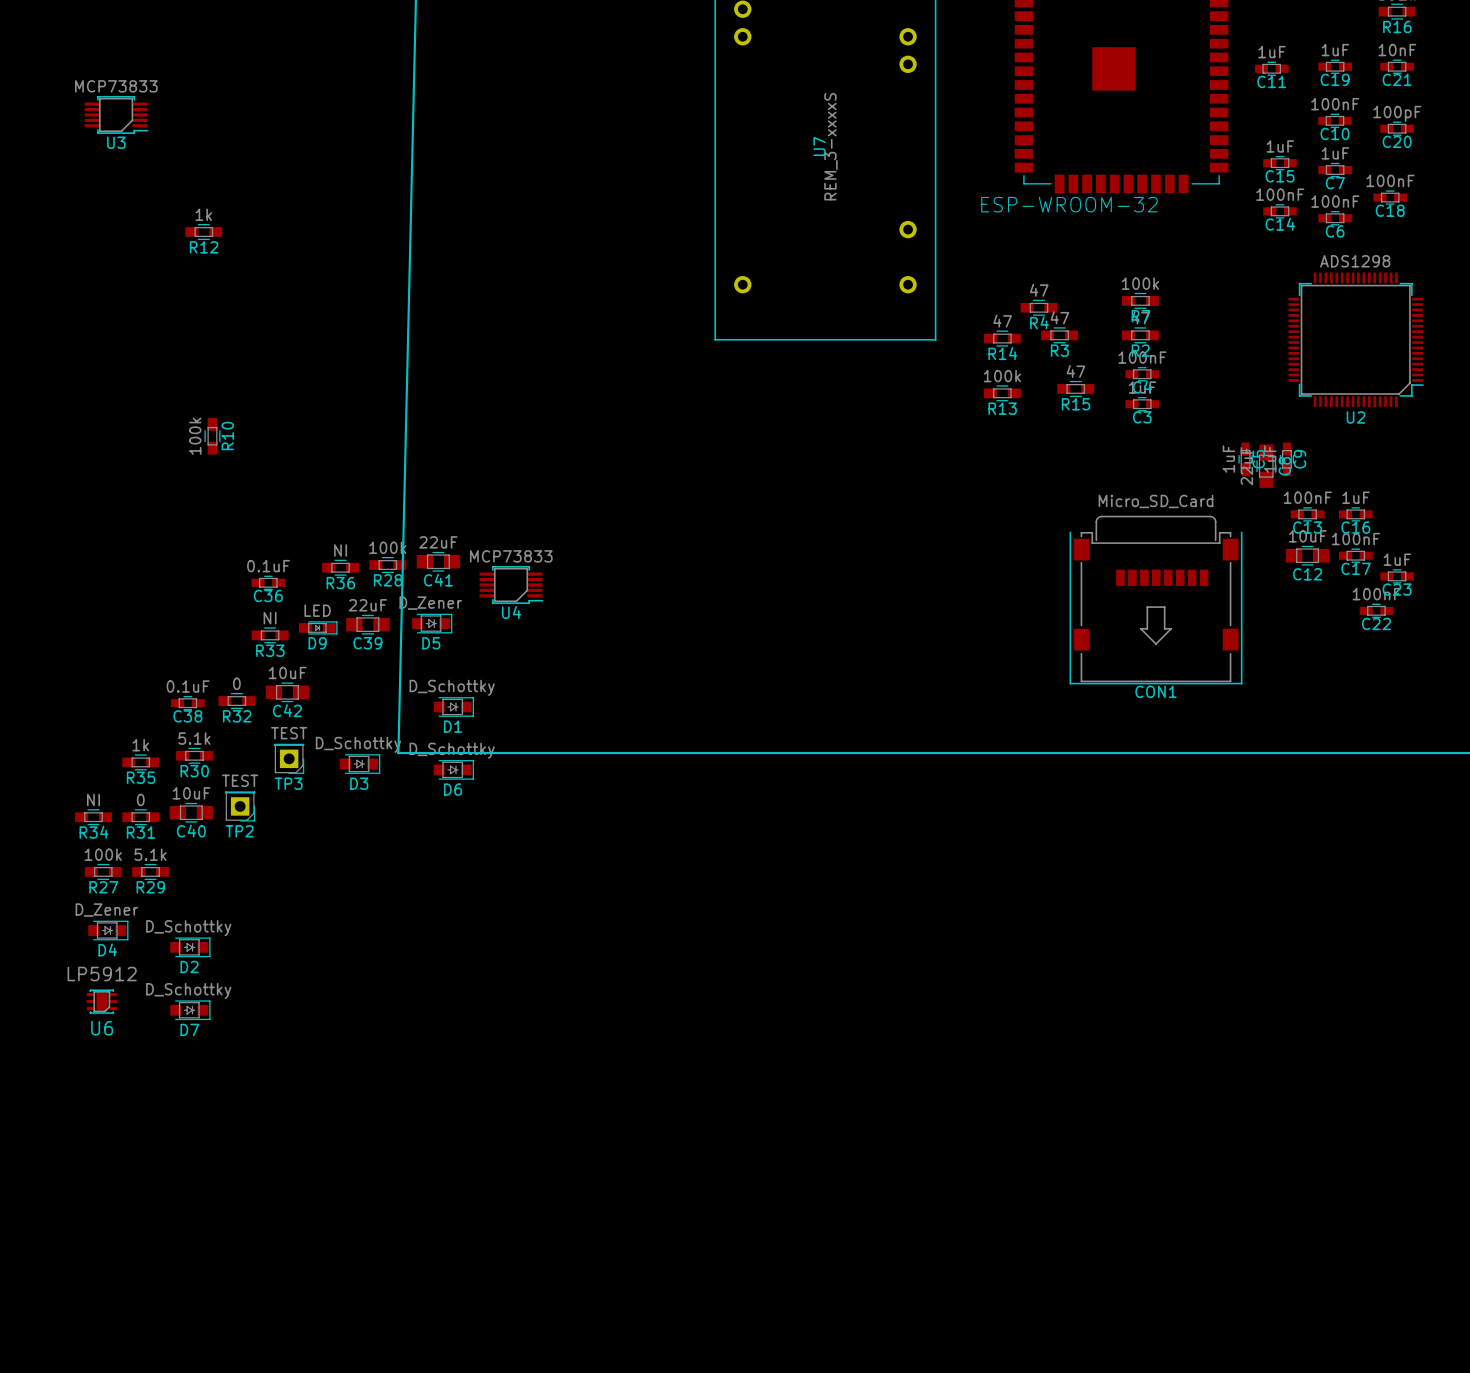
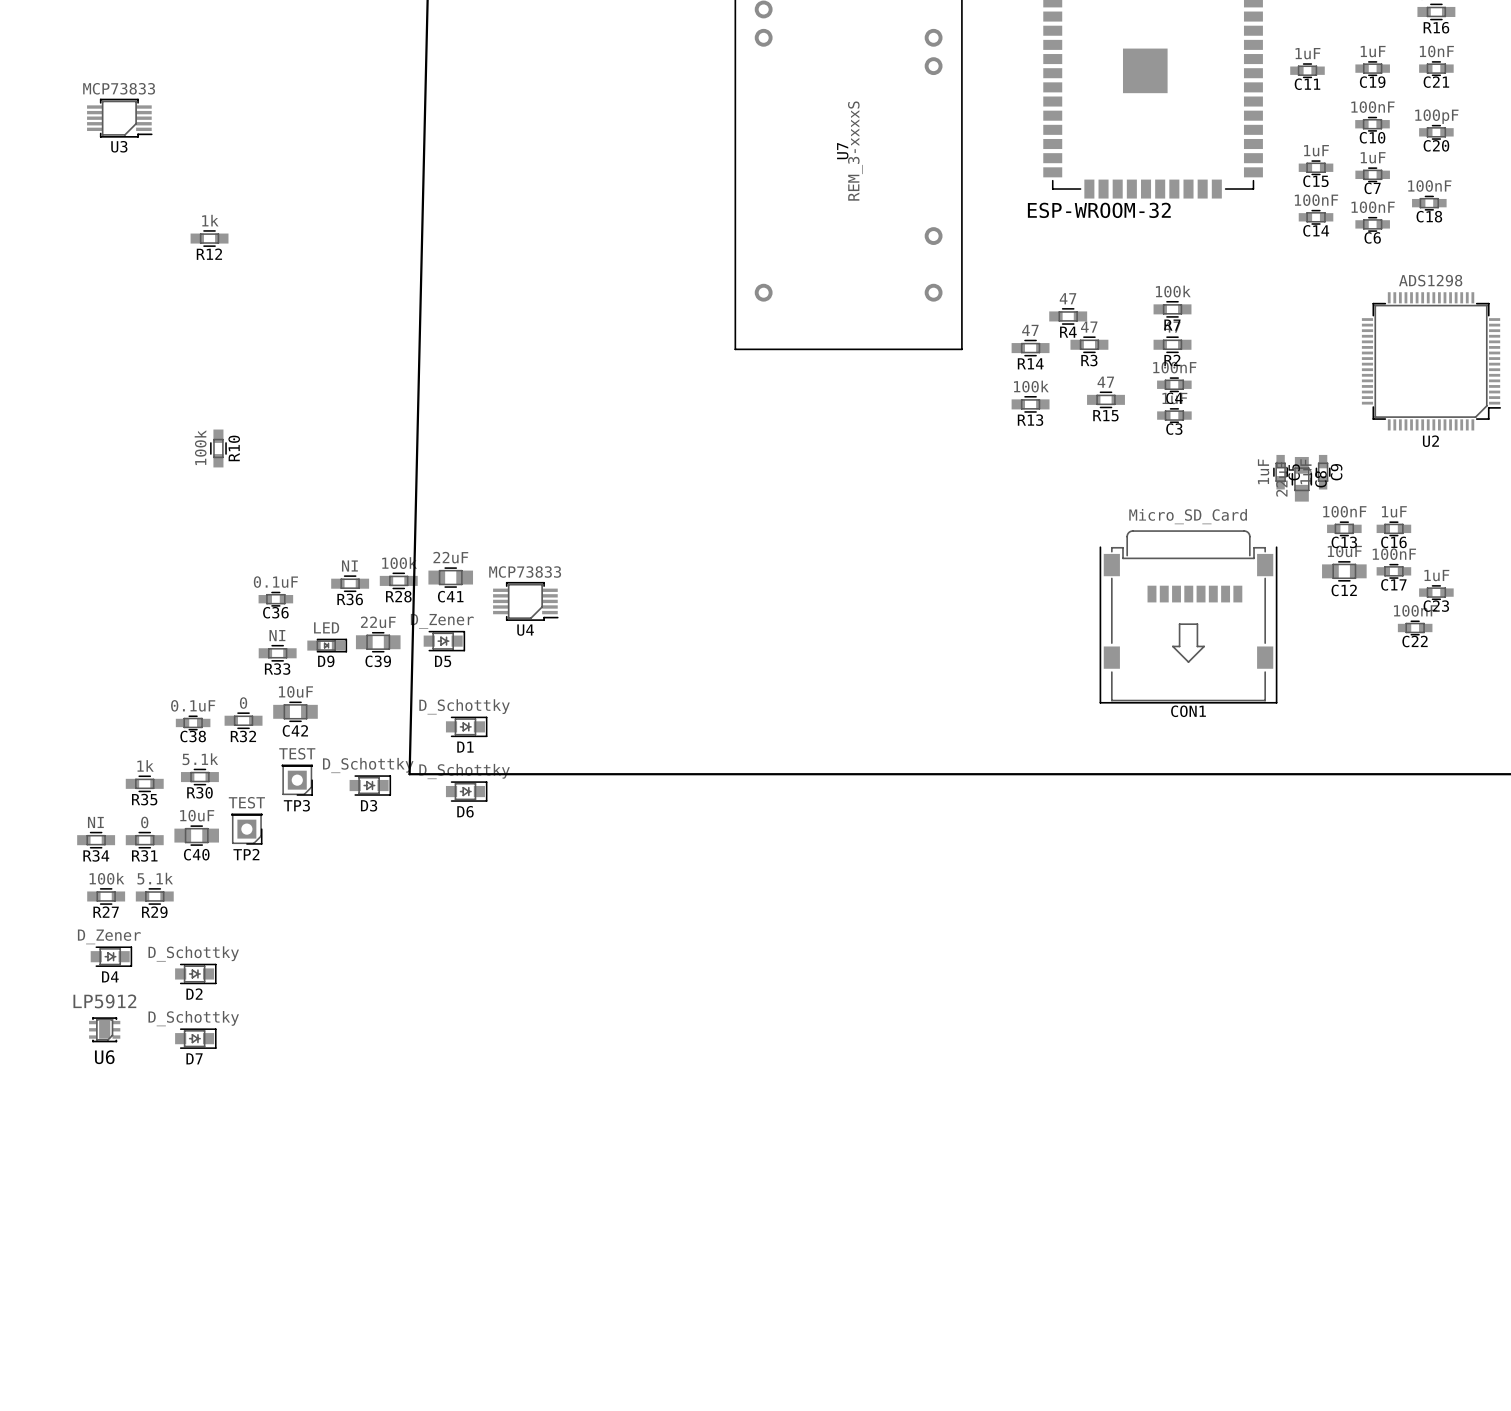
U2 position: (1356, 339) -> (1431, 361)

